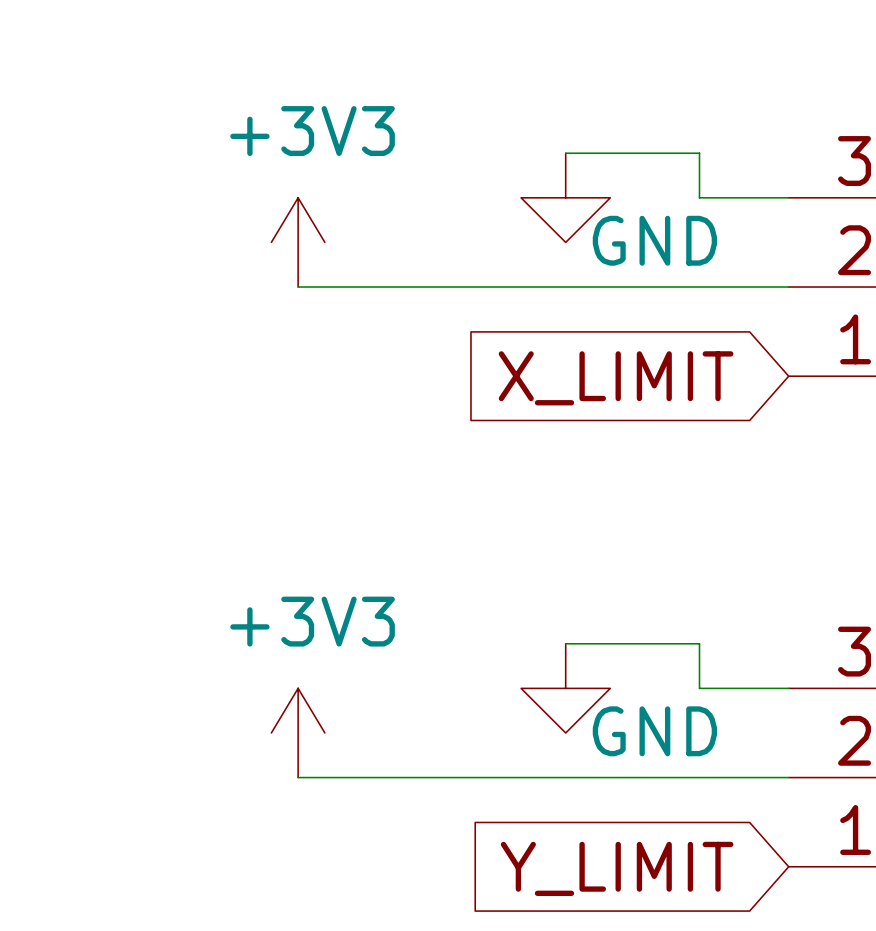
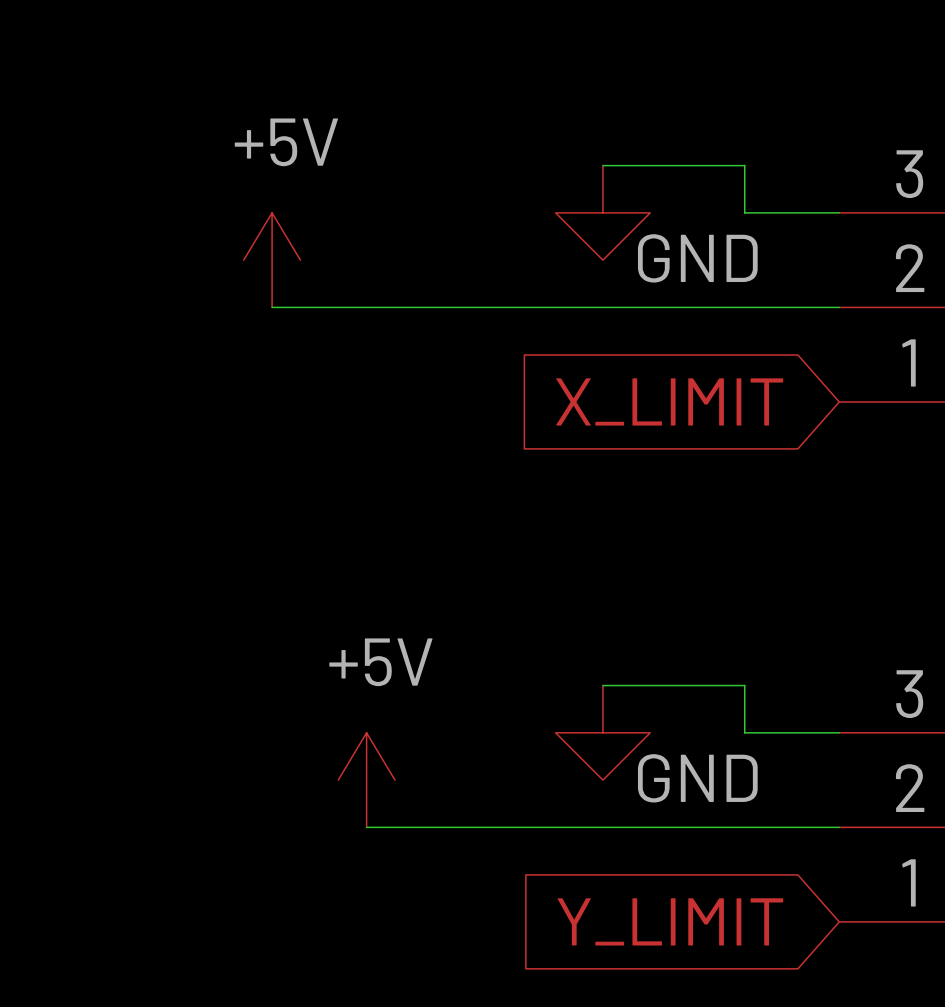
power symbol: none -> +5V (272, 260)
power symbol: +3V3 (298, 242) -> none
power symbol: +3V3 (298, 732) -> none
power symbol: none -> +5V (366, 780)
wire: (298, 777) (342, 777) -> (272, 307) (319, 307)

